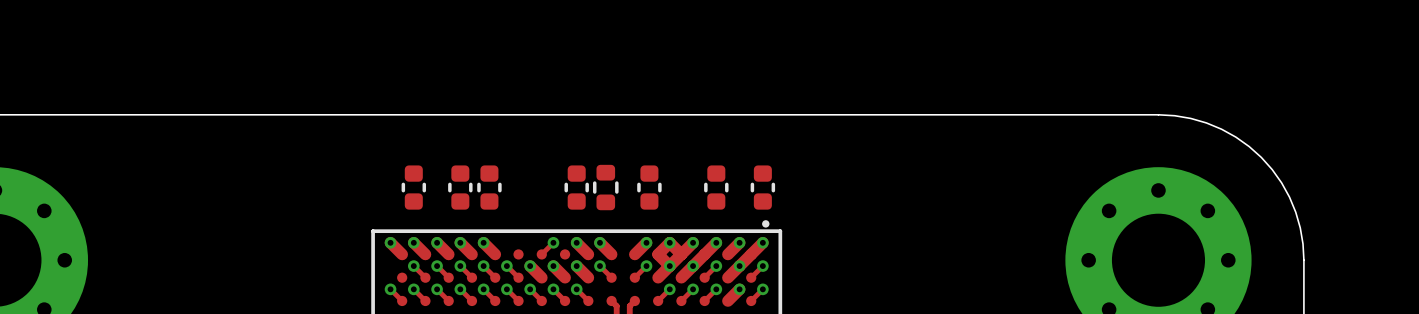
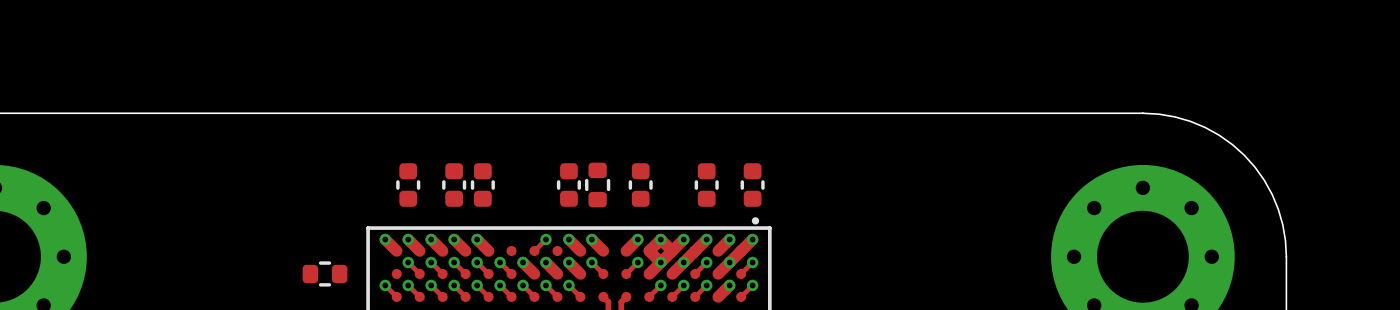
part: none -> (325, 273)

